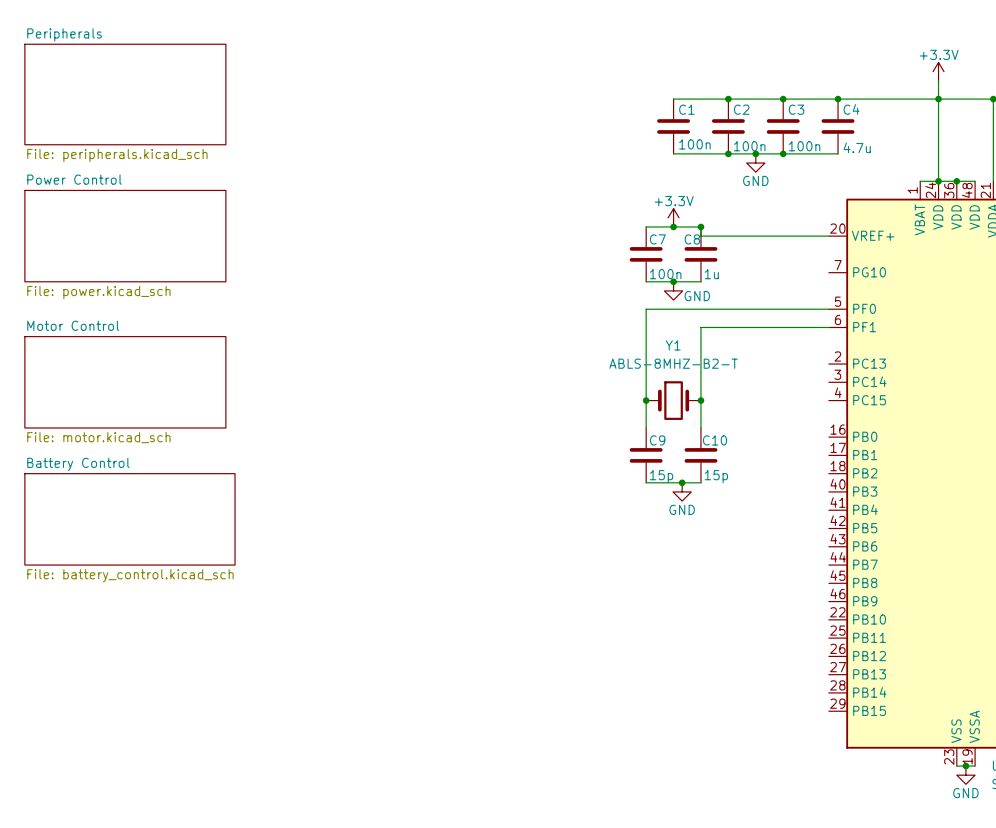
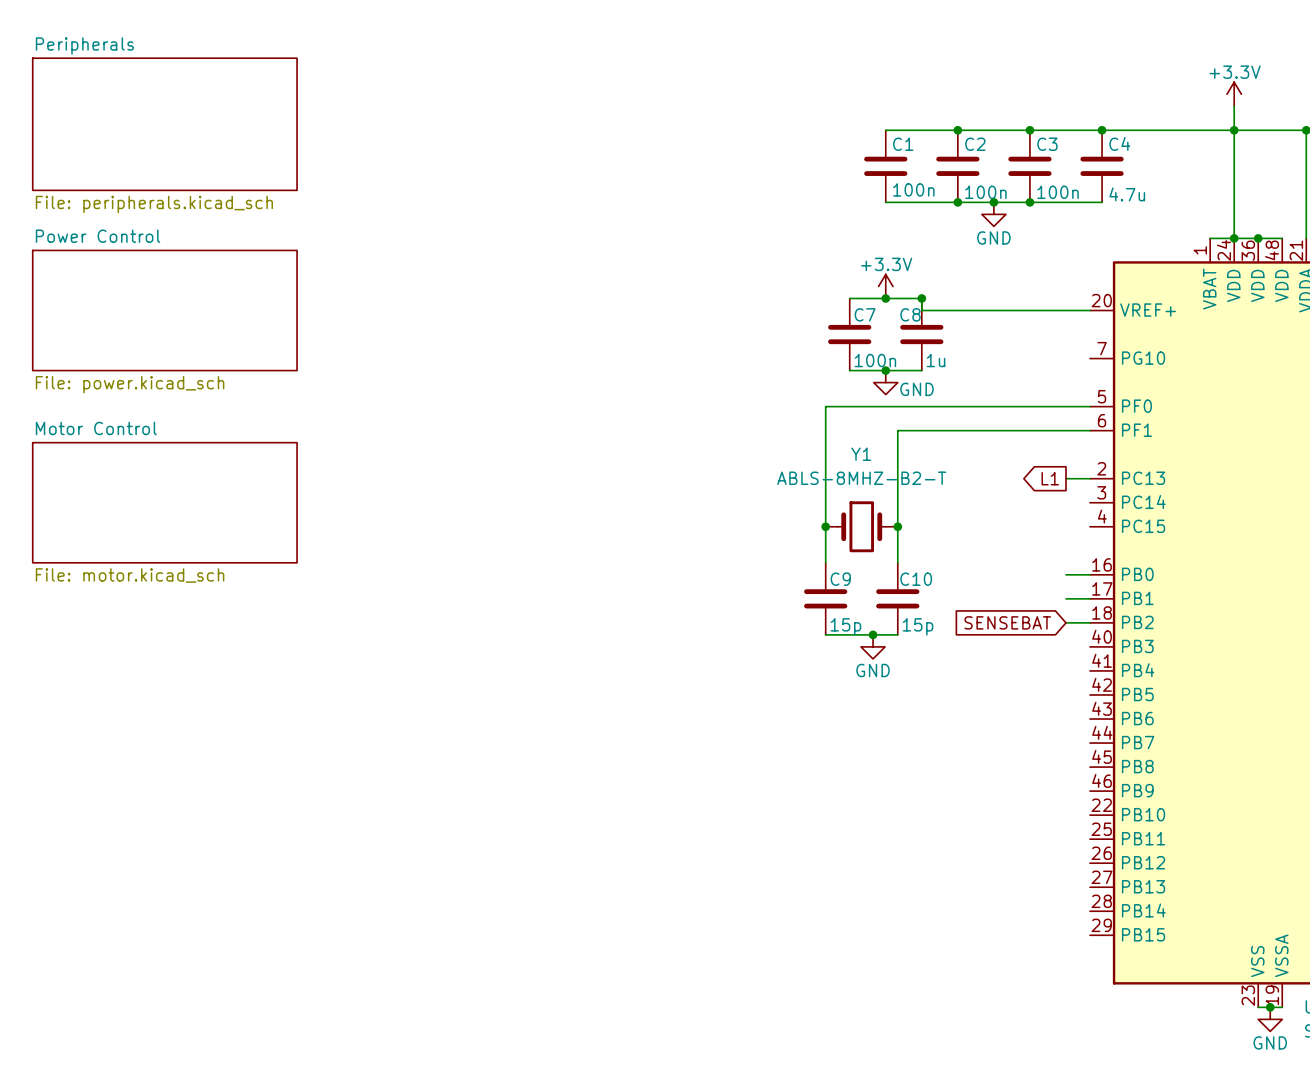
wire: (646, 309) (646, 427) -> (849, 406) (825, 406) (825, 562)
wire: (700, 327) (700, 427) -> (921, 430) (897, 430) (897, 562)
global label: none -> L1 (1050, 478)
wire: none -> (1065, 478) (1090, 478)
junction: none -> (825, 526)
junction: (646, 400) -> none
Y1 position: (673, 400) -> (861, 526)
junction: none -> (897, 526)
junction: (700, 400) -> none
wire: none -> (1065, 574) (1090, 574)
C9 position: (646, 455) -> (825, 598)
C10 position: (700, 455) -> (897, 598)
wire: none -> (1065, 598) (1090, 598)
global label: none -> SENSEBAT (1007, 622)
wire: none -> (1065, 622) (1090, 622)
wire: (682, 482) (700, 482) -> (825, 634) (849, 634)
junction position: (682, 482) -> (873, 634)
power symbol position: GND (682, 491) -> GND (873, 646)
sheet Battery Control: File: battery_control.kicad_sch (129, 519) -> none

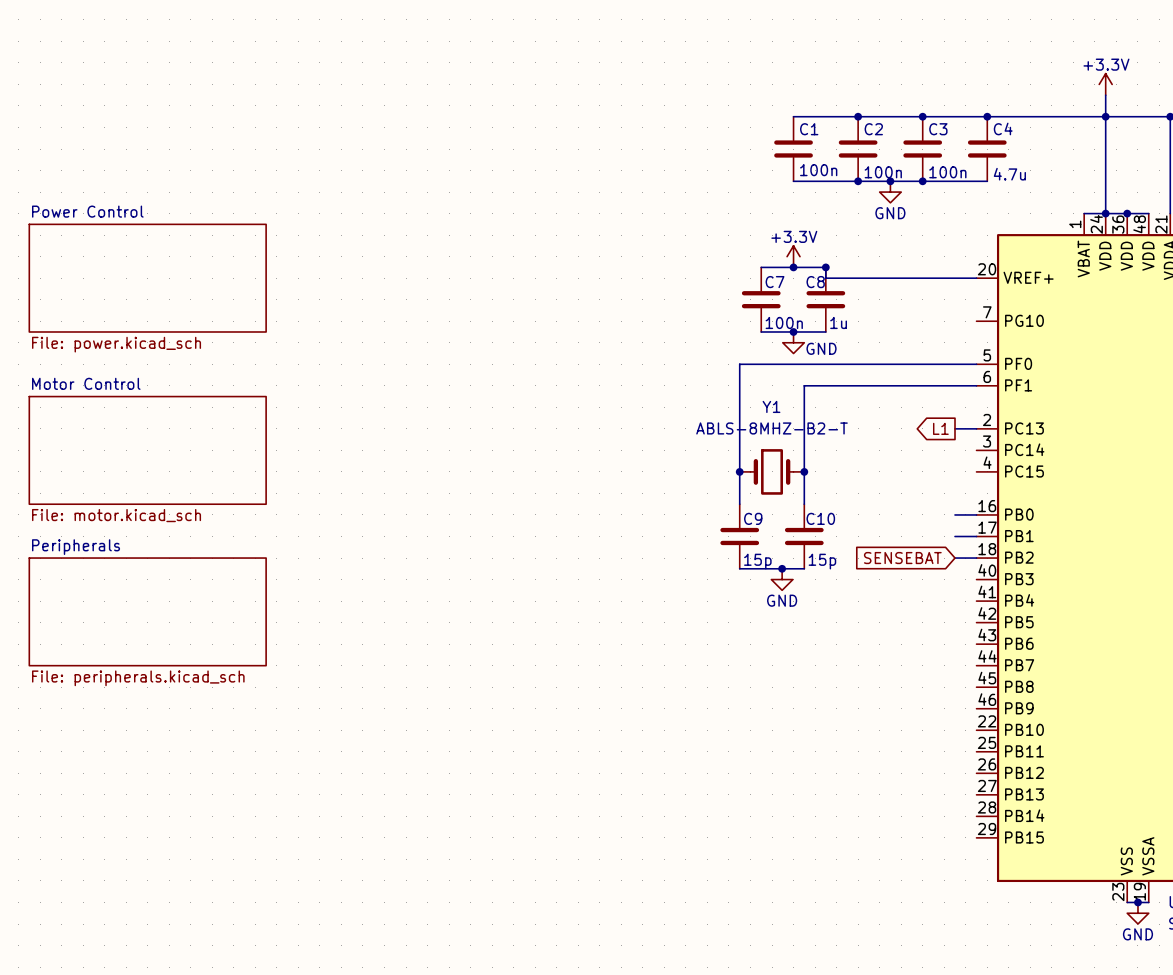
sheet Peripherals: File: peripherals.kicad_sch (164, 124) -> none
sheet Peripherals: none -> File: peripherals.kicad_sch (147, 611)

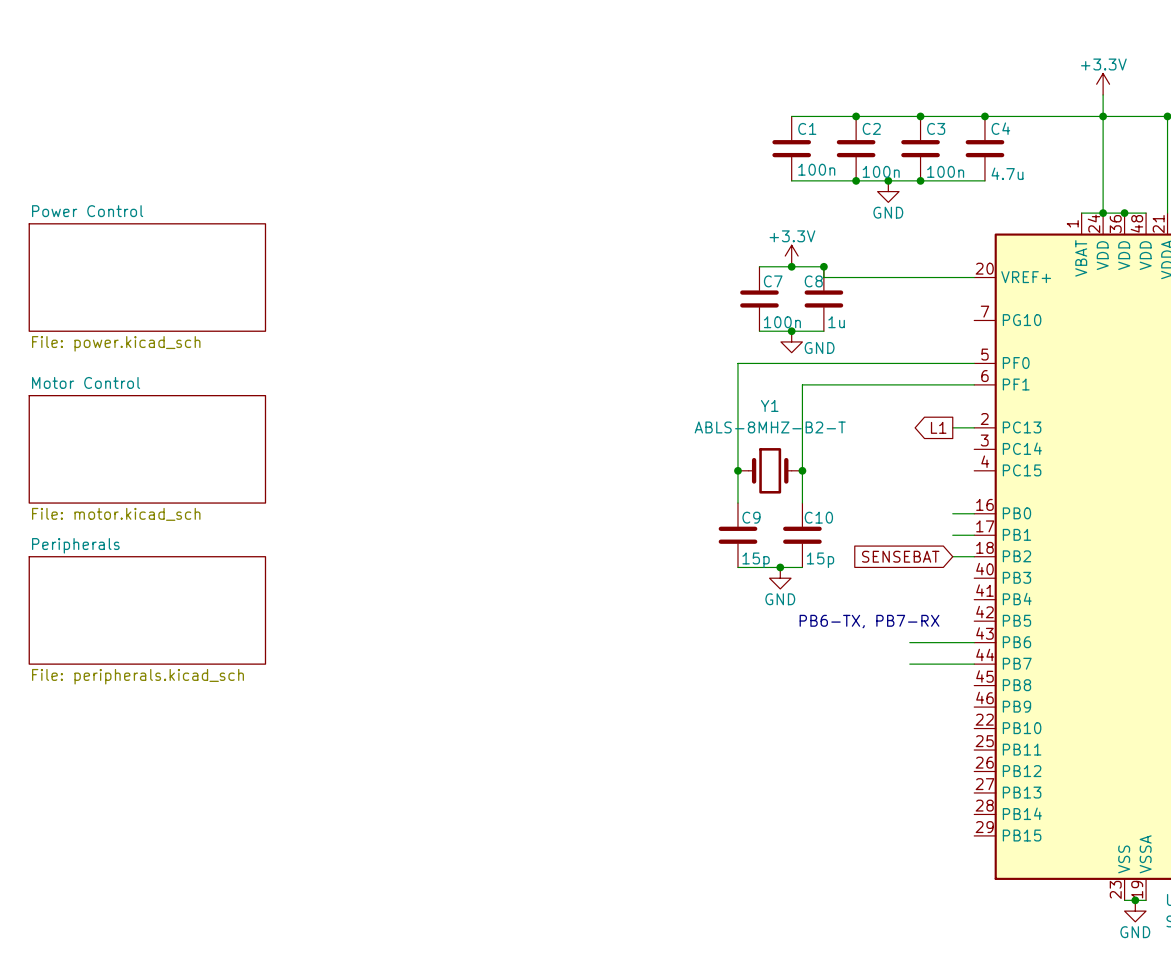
text: none -> PB6-TX, PB7-RX (869, 621)
wire: none -> (909, 642) (974, 642)
wire: none -> (909, 664) (974, 664)

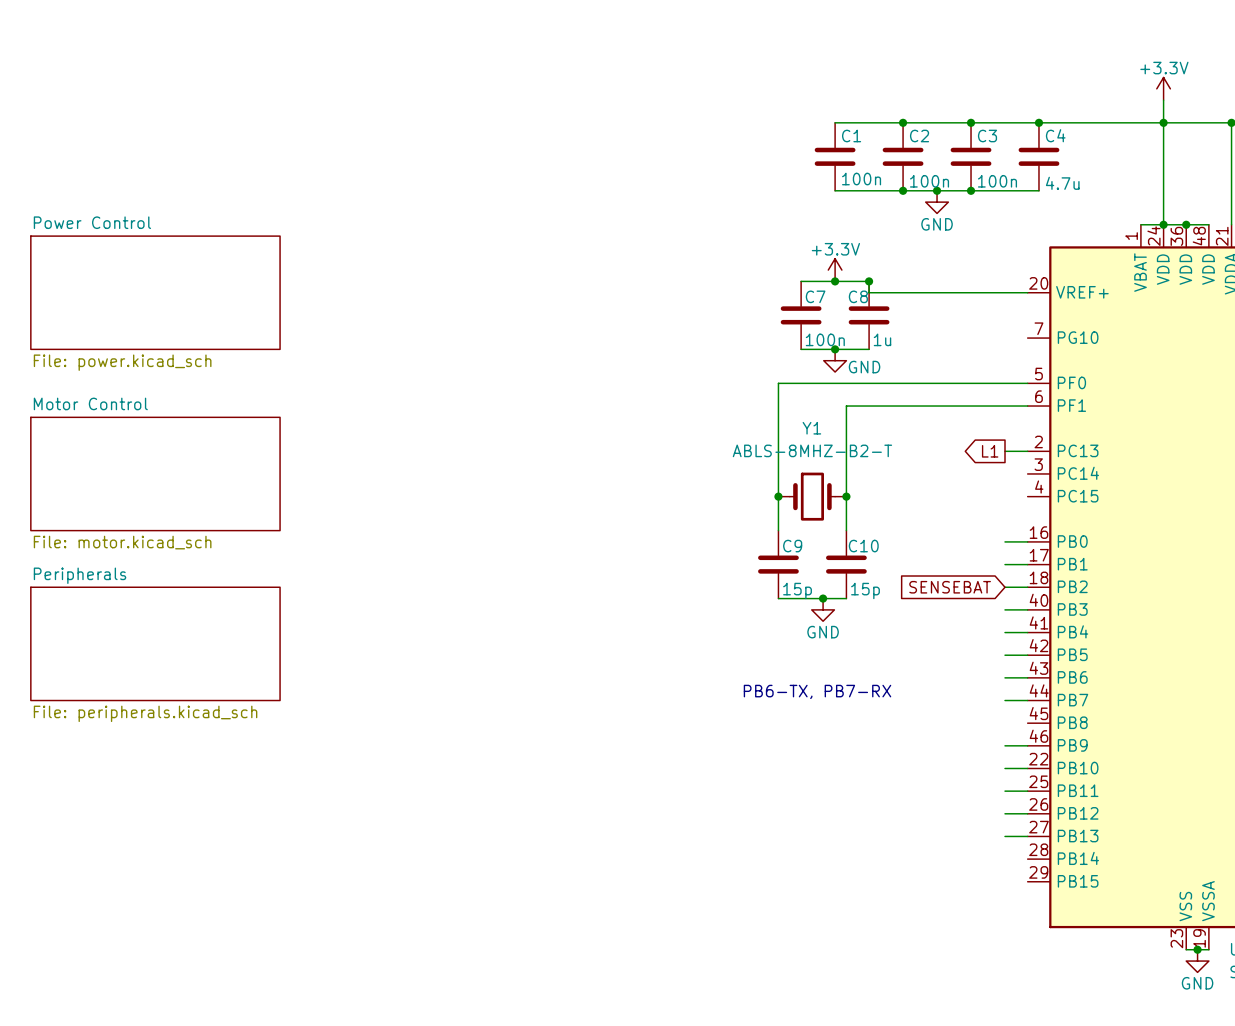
wire: none -> (1005, 609) (1027, 609)
wire: none -> (1005, 632) (1027, 632)
text position: PB6-TX, PB7-RX (869, 621) -> PB6-TX, PB7-RX (817, 691)
wire: none -> (1005, 655) (1027, 655)
wire: (909, 642) (952, 642) -> none
wire: (909, 664) (952, 664) -> none
wire: none -> (1005, 745) (1027, 745)
wire: none -> (1005, 768) (1027, 768)
wire: none -> (1005, 791) (1027, 791)
wire: none -> (1005, 813) (1027, 813)
wire: none -> (1005, 836) (1027, 836)

